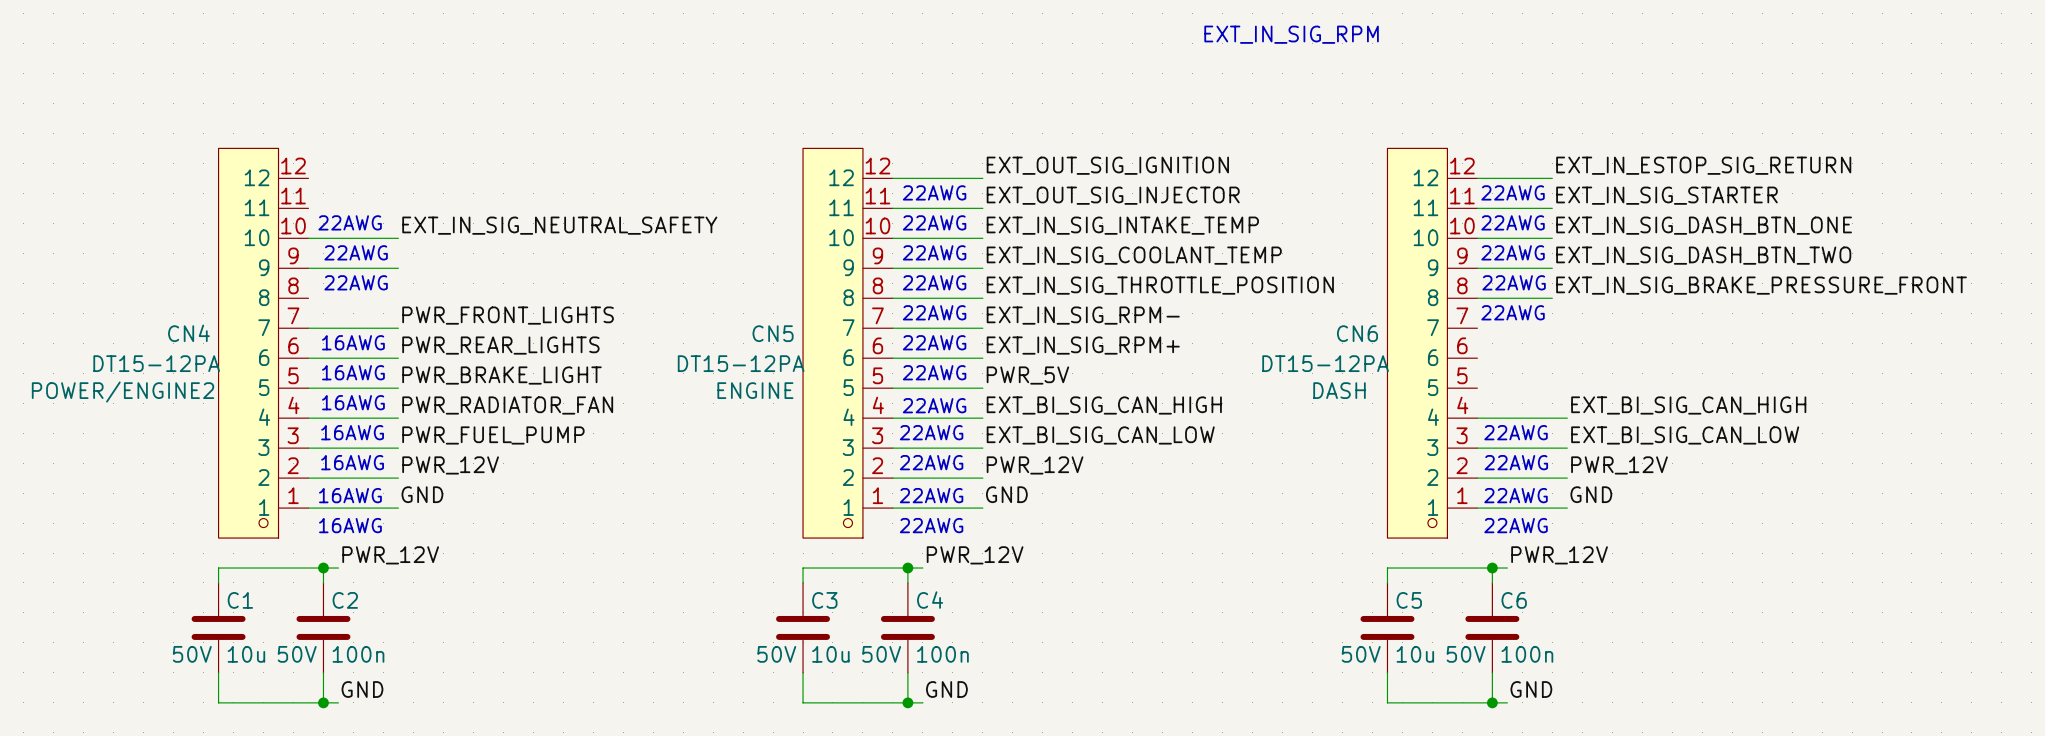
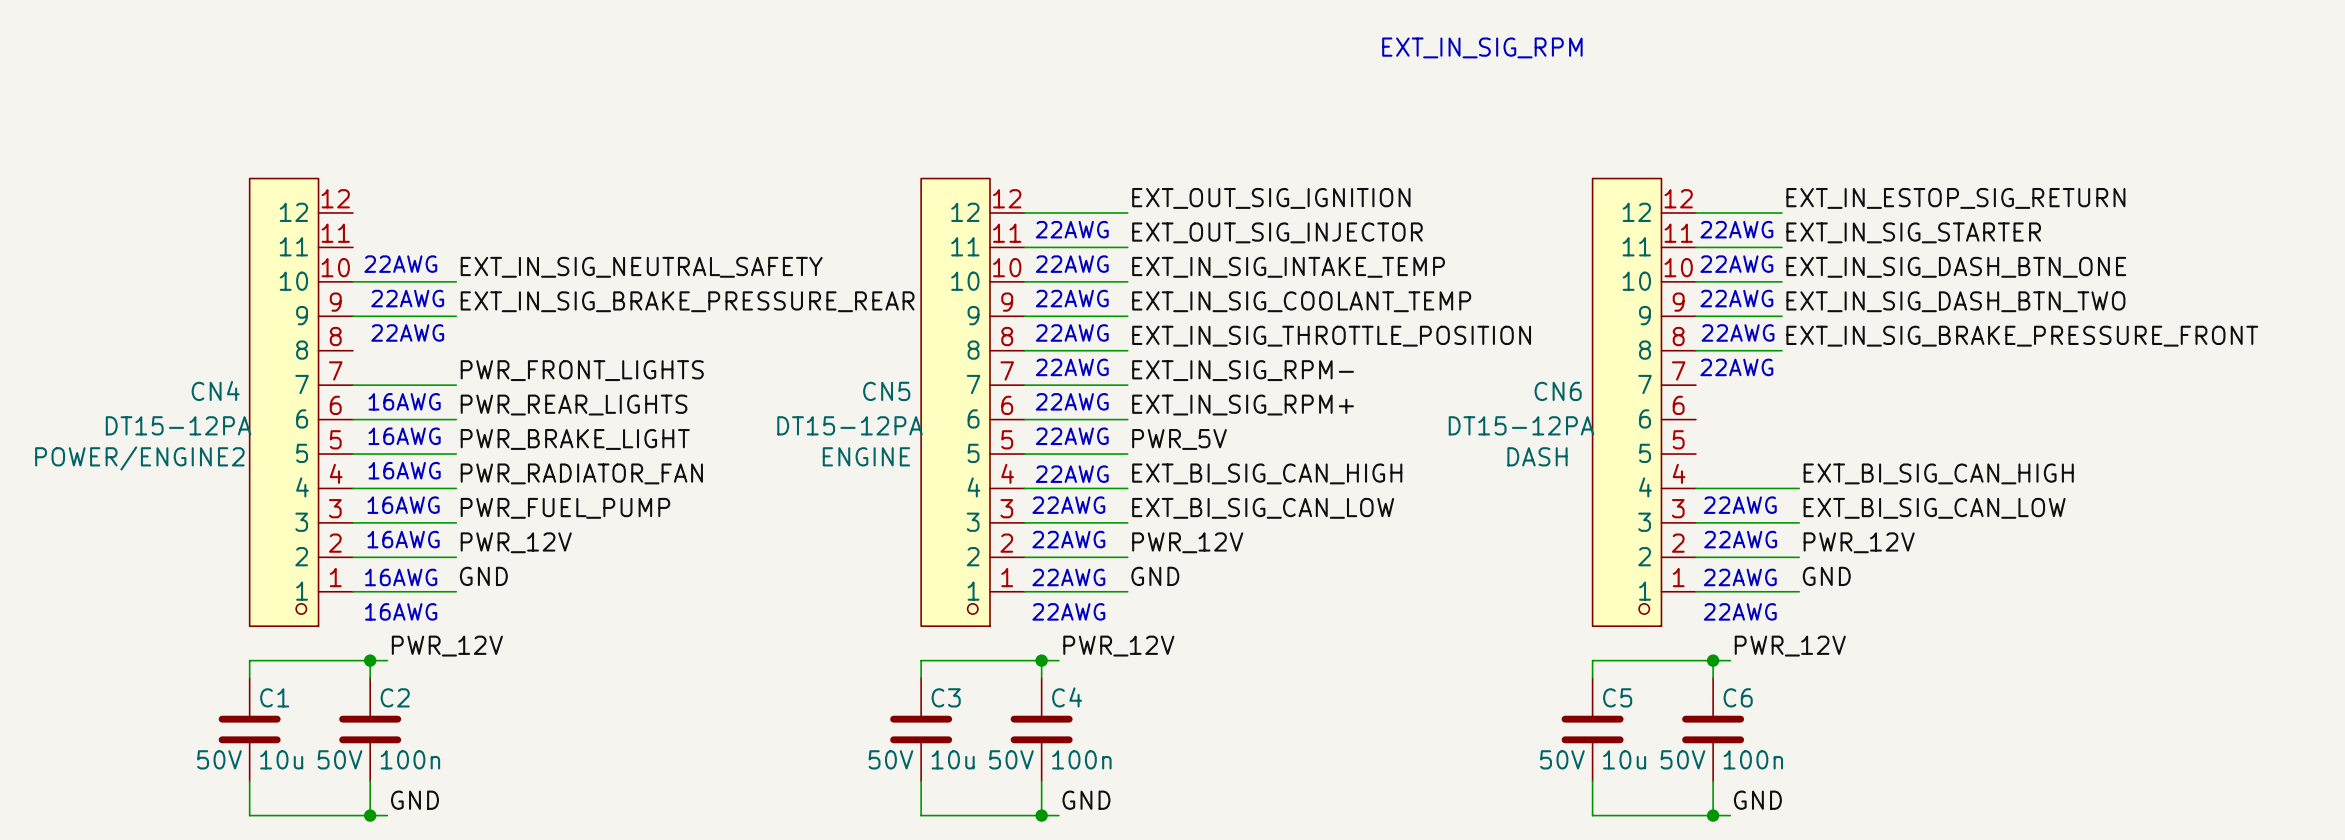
label: none -> EXT_IN_SIG_BRAKE_PRESSURE_REAR (687, 301)

